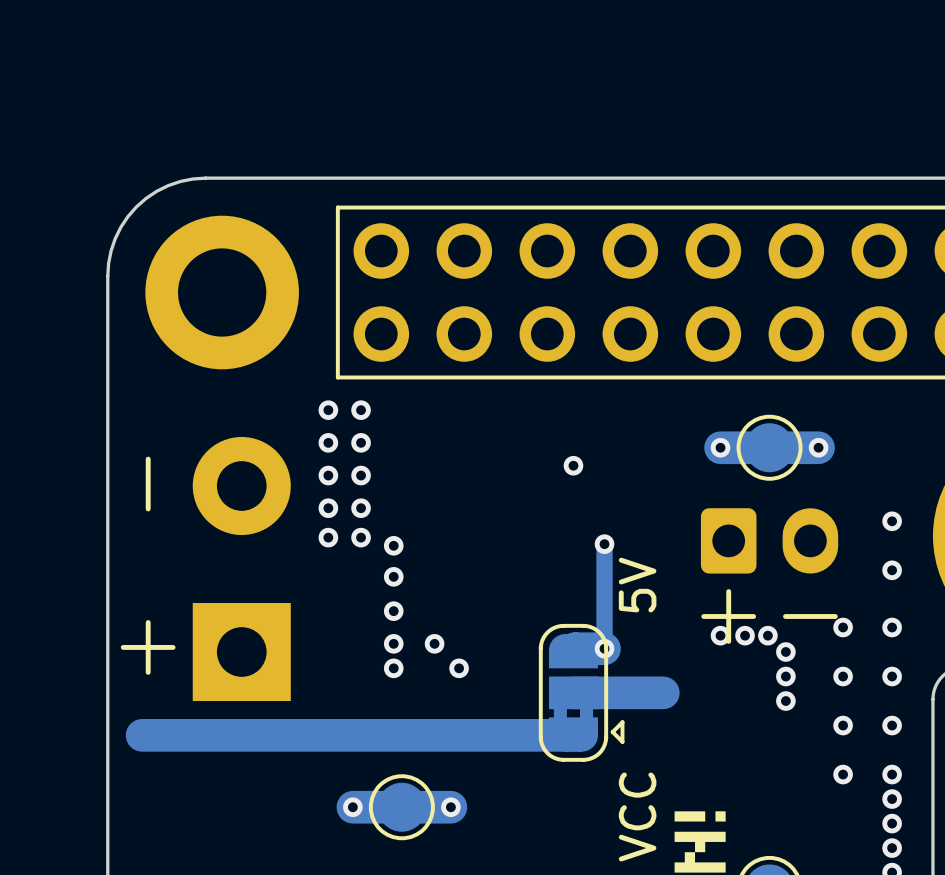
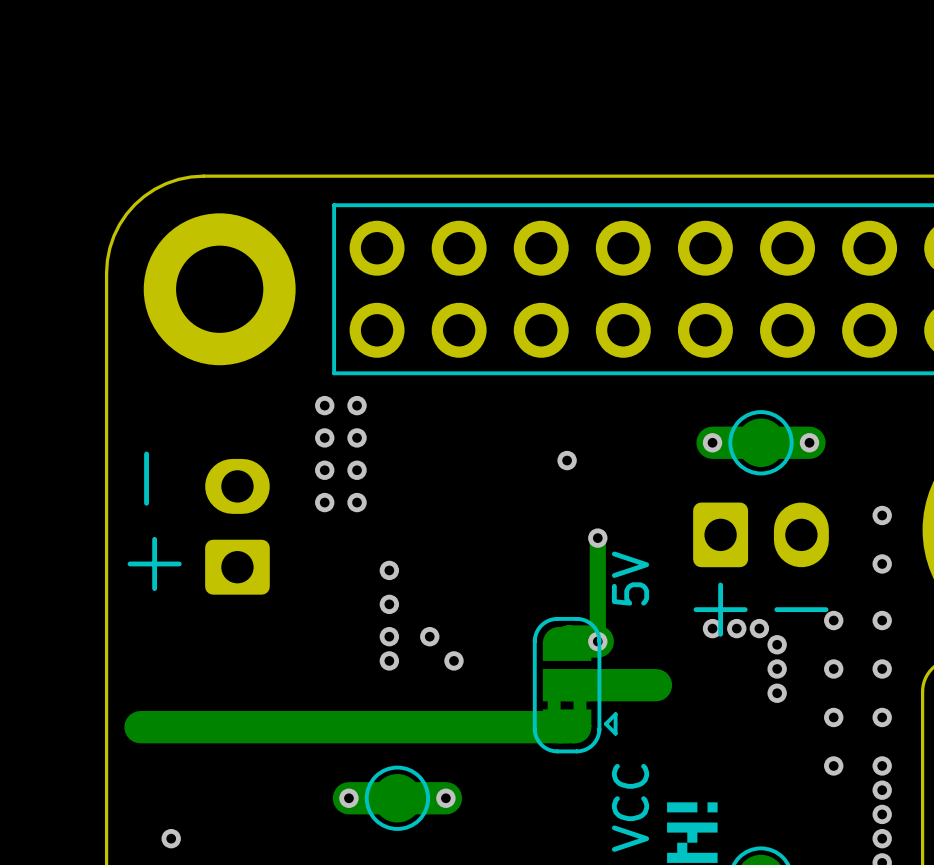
part: none -> (237, 526)
via: (328, 537) -> none
via: (361, 537) -> none
via: (393, 545) -> none
part: (241, 568) -> none
text position: + (148, 647) -> + (154, 563)
via: none -> (171, 838)

